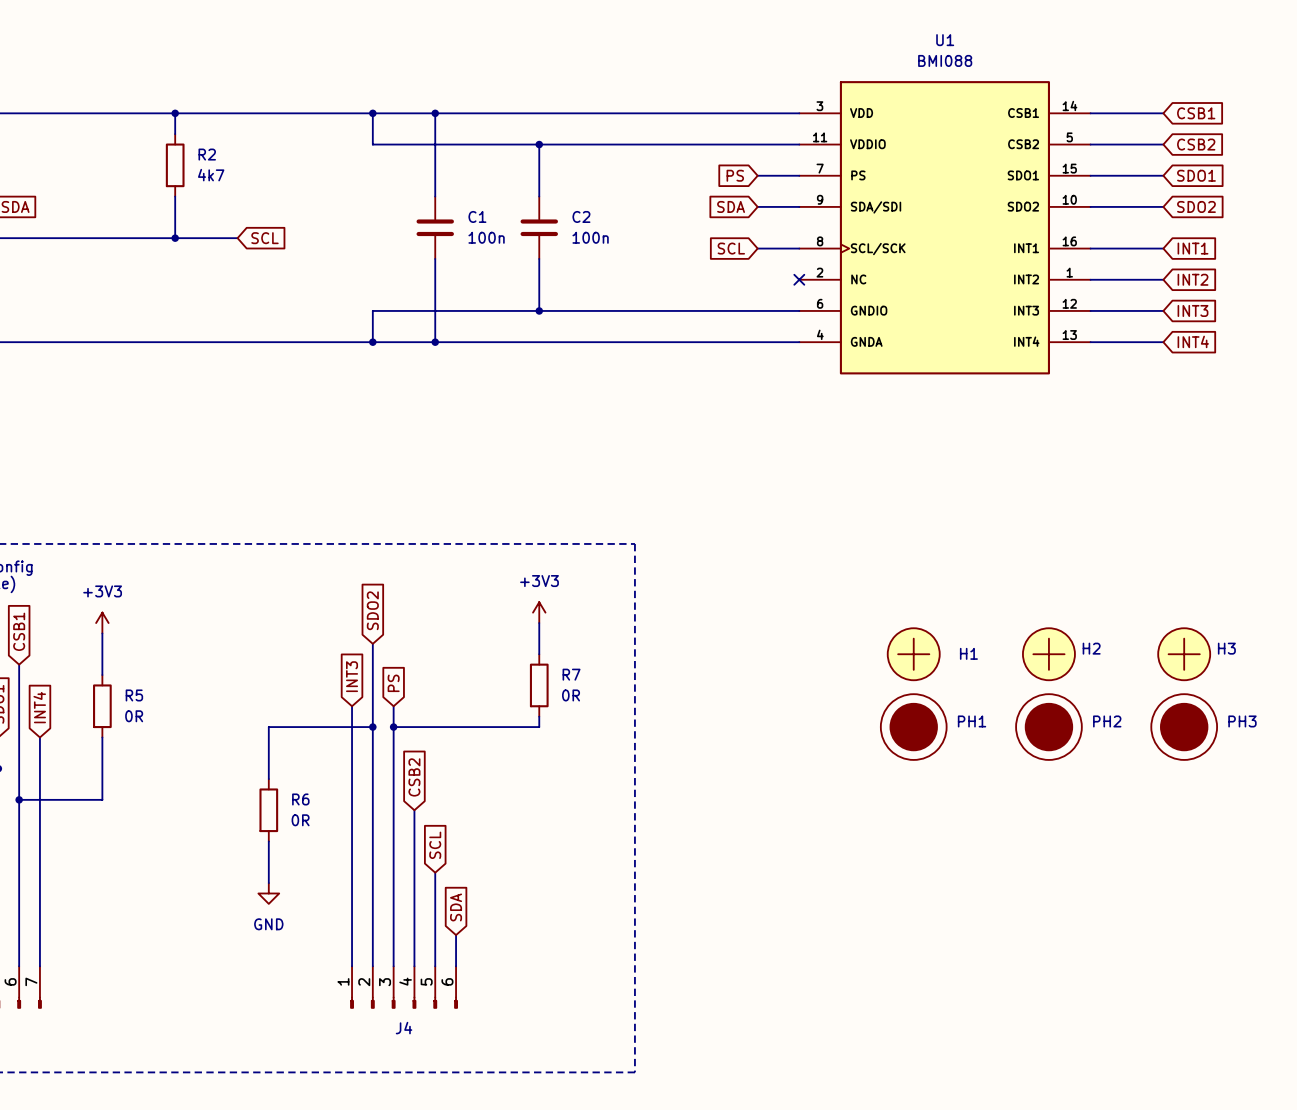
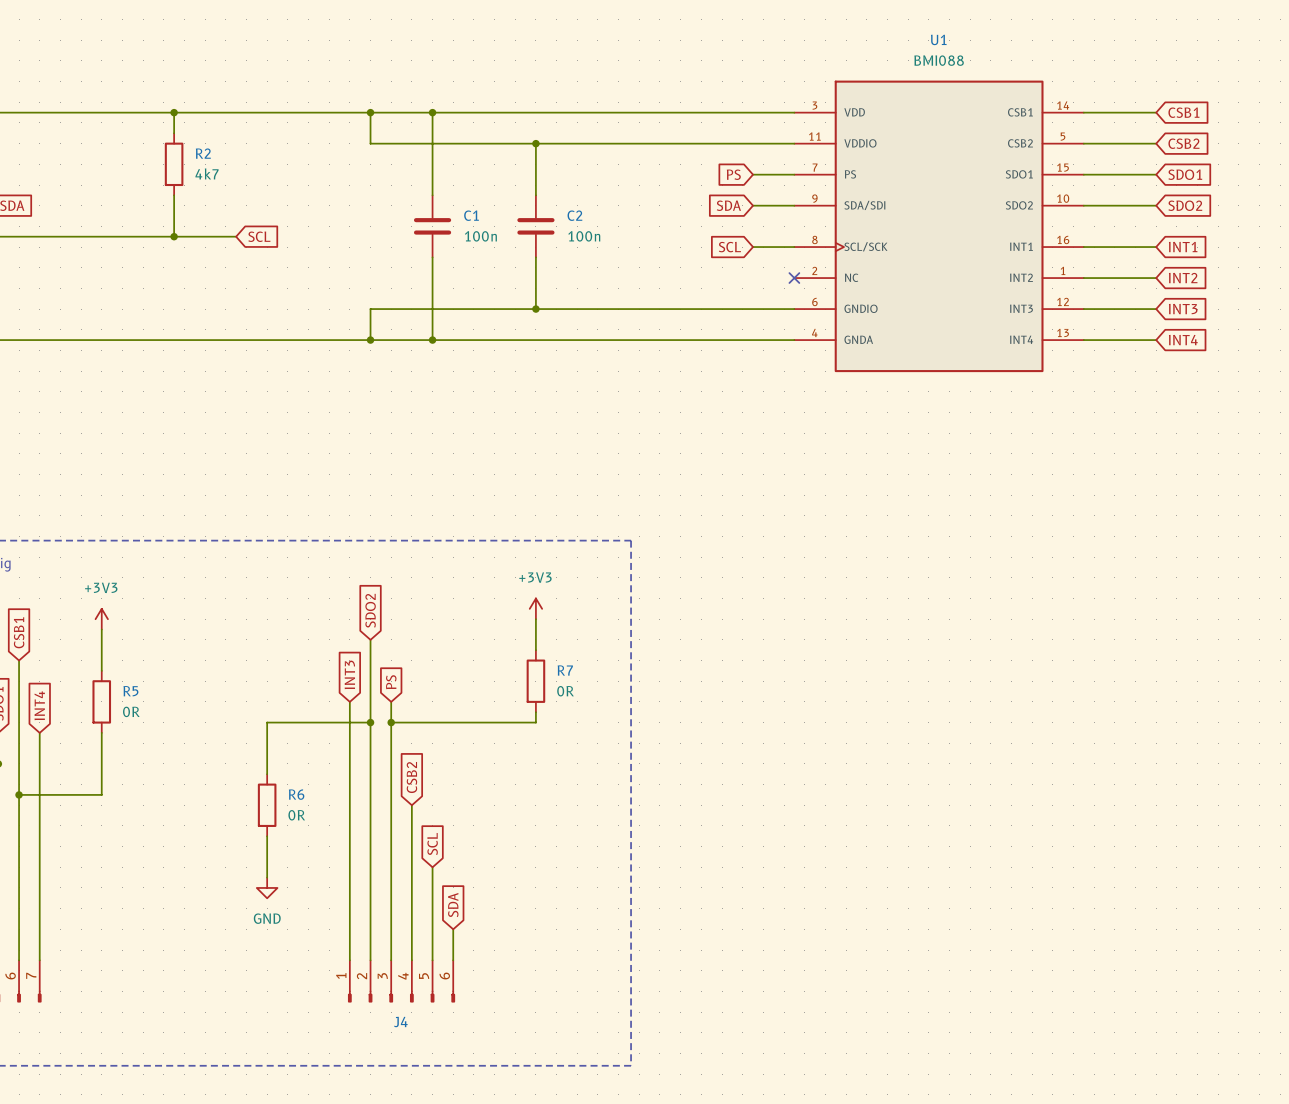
H1: (913, 654) -> none
H2: (1048, 654) -> none
H3: (1184, 654) -> none
PH1: (913, 727) -> none
PH2: (1048, 727) -> none
PH3: (1184, 727) -> none

